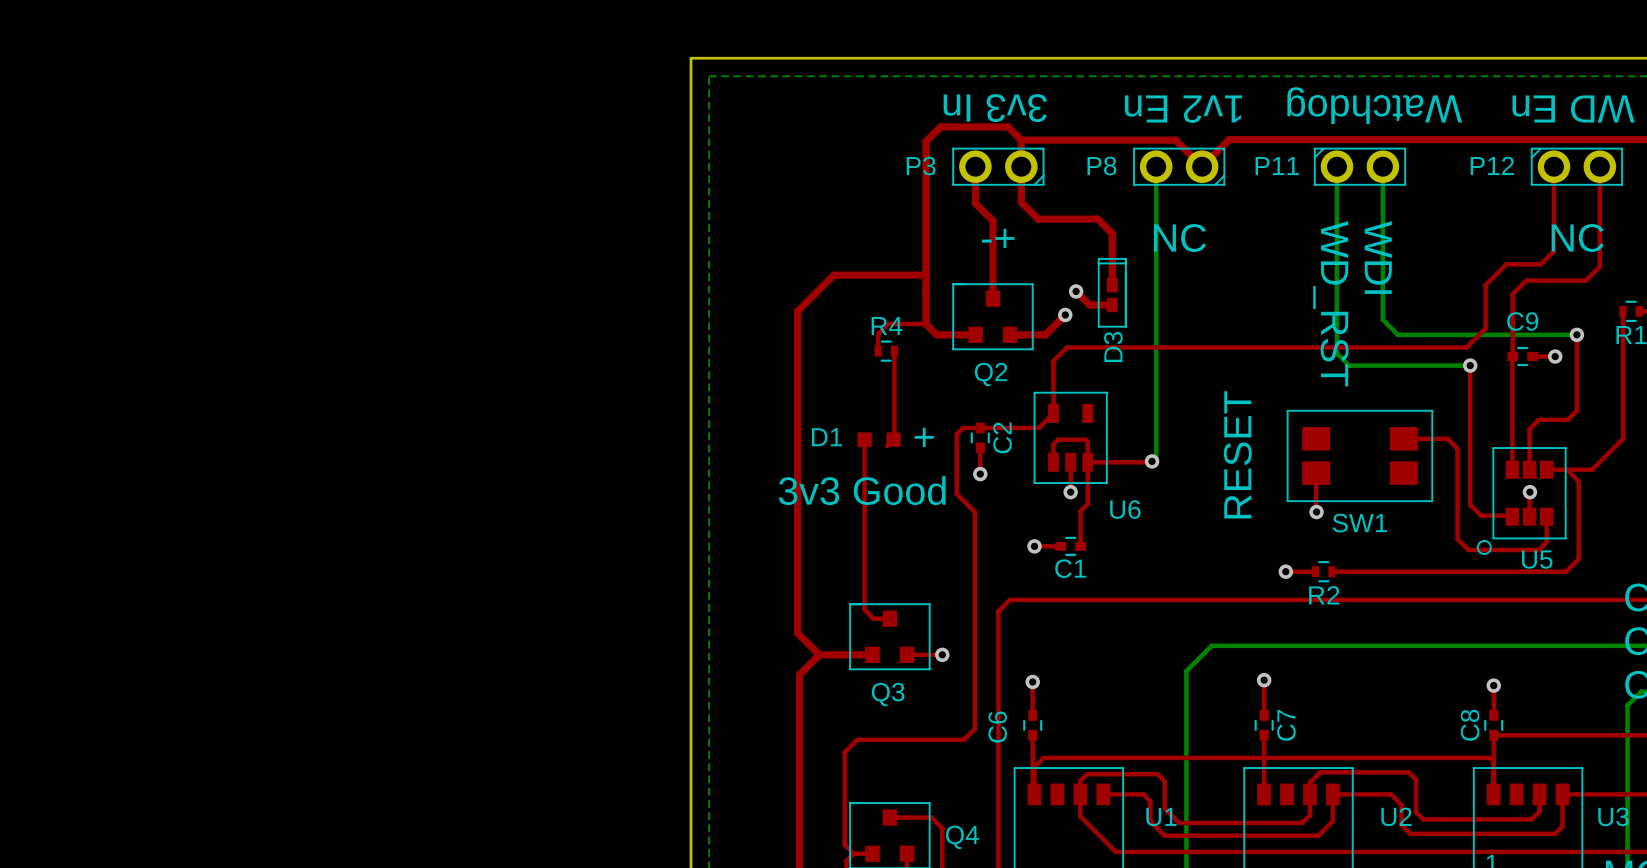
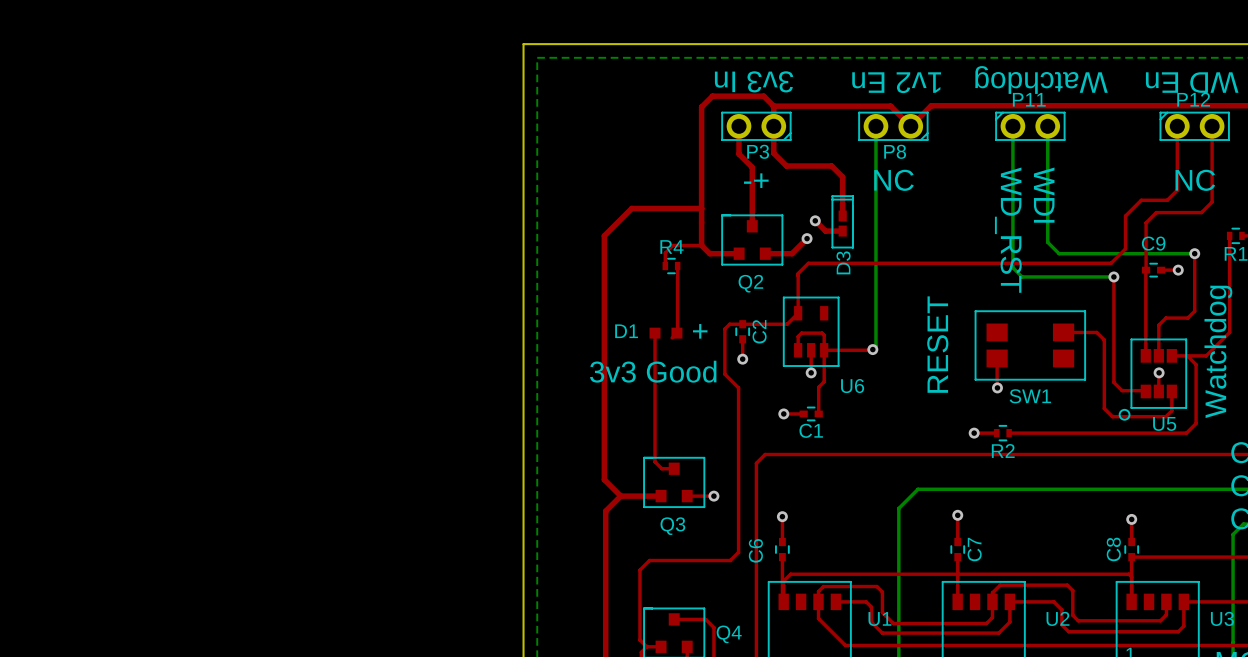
P12 name position: P12 (1492, 165) -> P12 (1193, 99)
P3 name position: P3 (921, 166) -> P3 (758, 151)
P8 name position: P8 (1101, 166) -> P8 (895, 151)
P11 name position: P11 (1277, 166) -> P11 (1029, 99)
text: none -> Watchdog (1218, 351)

